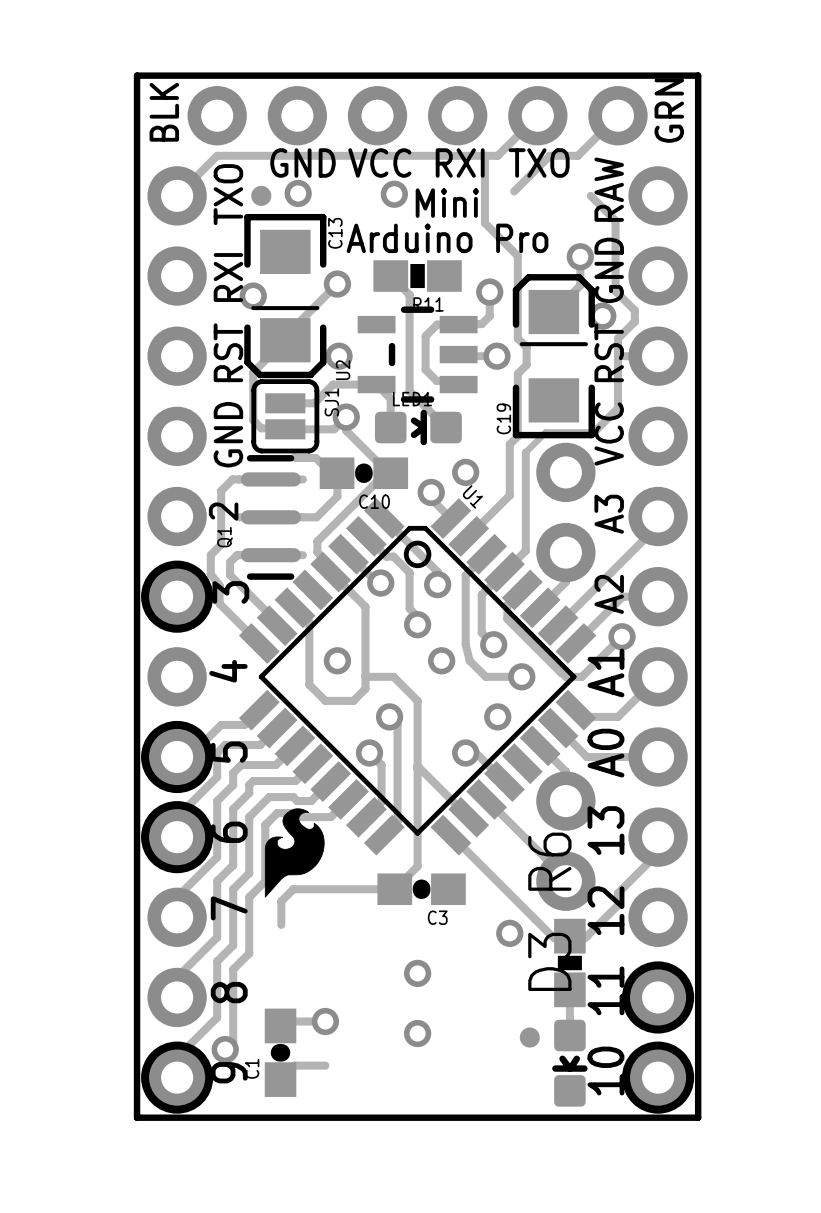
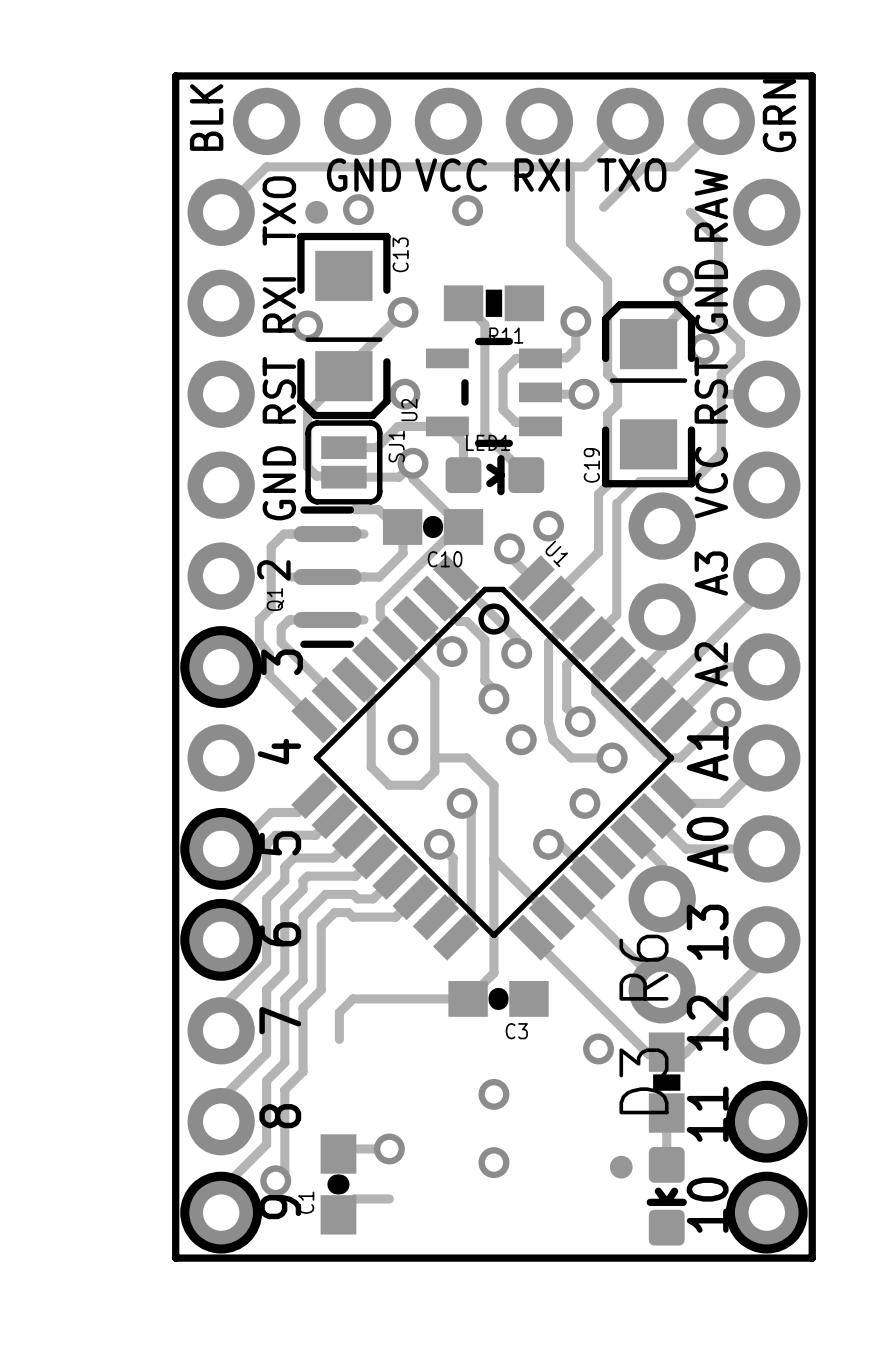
text: Mini (447, 203) -> none
text: Arduino Pro (447, 238) -> none
drawing: [264, 808, 325, 898] -> none

